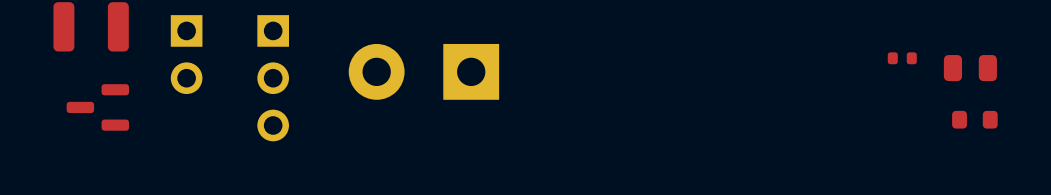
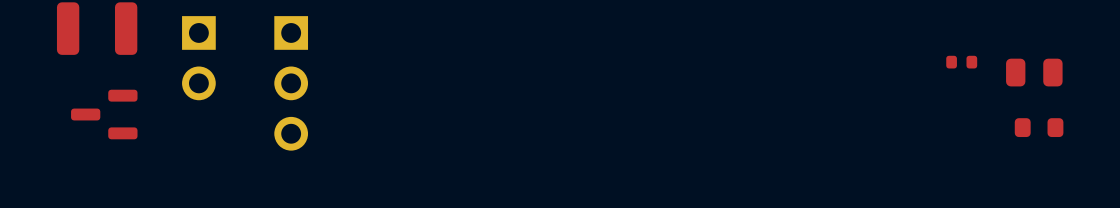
part: (423, 71) -> none

